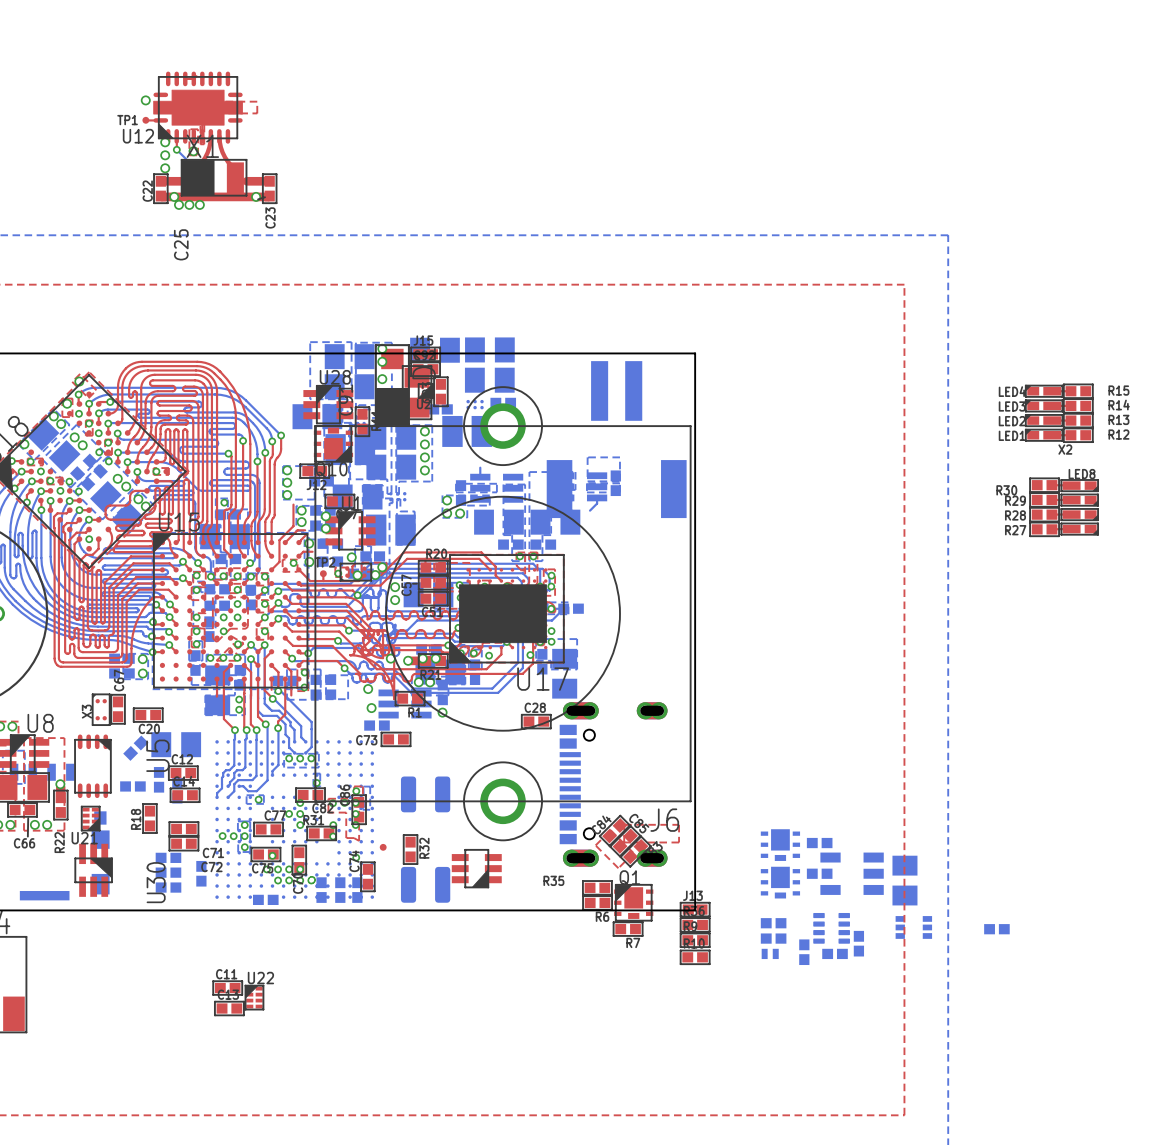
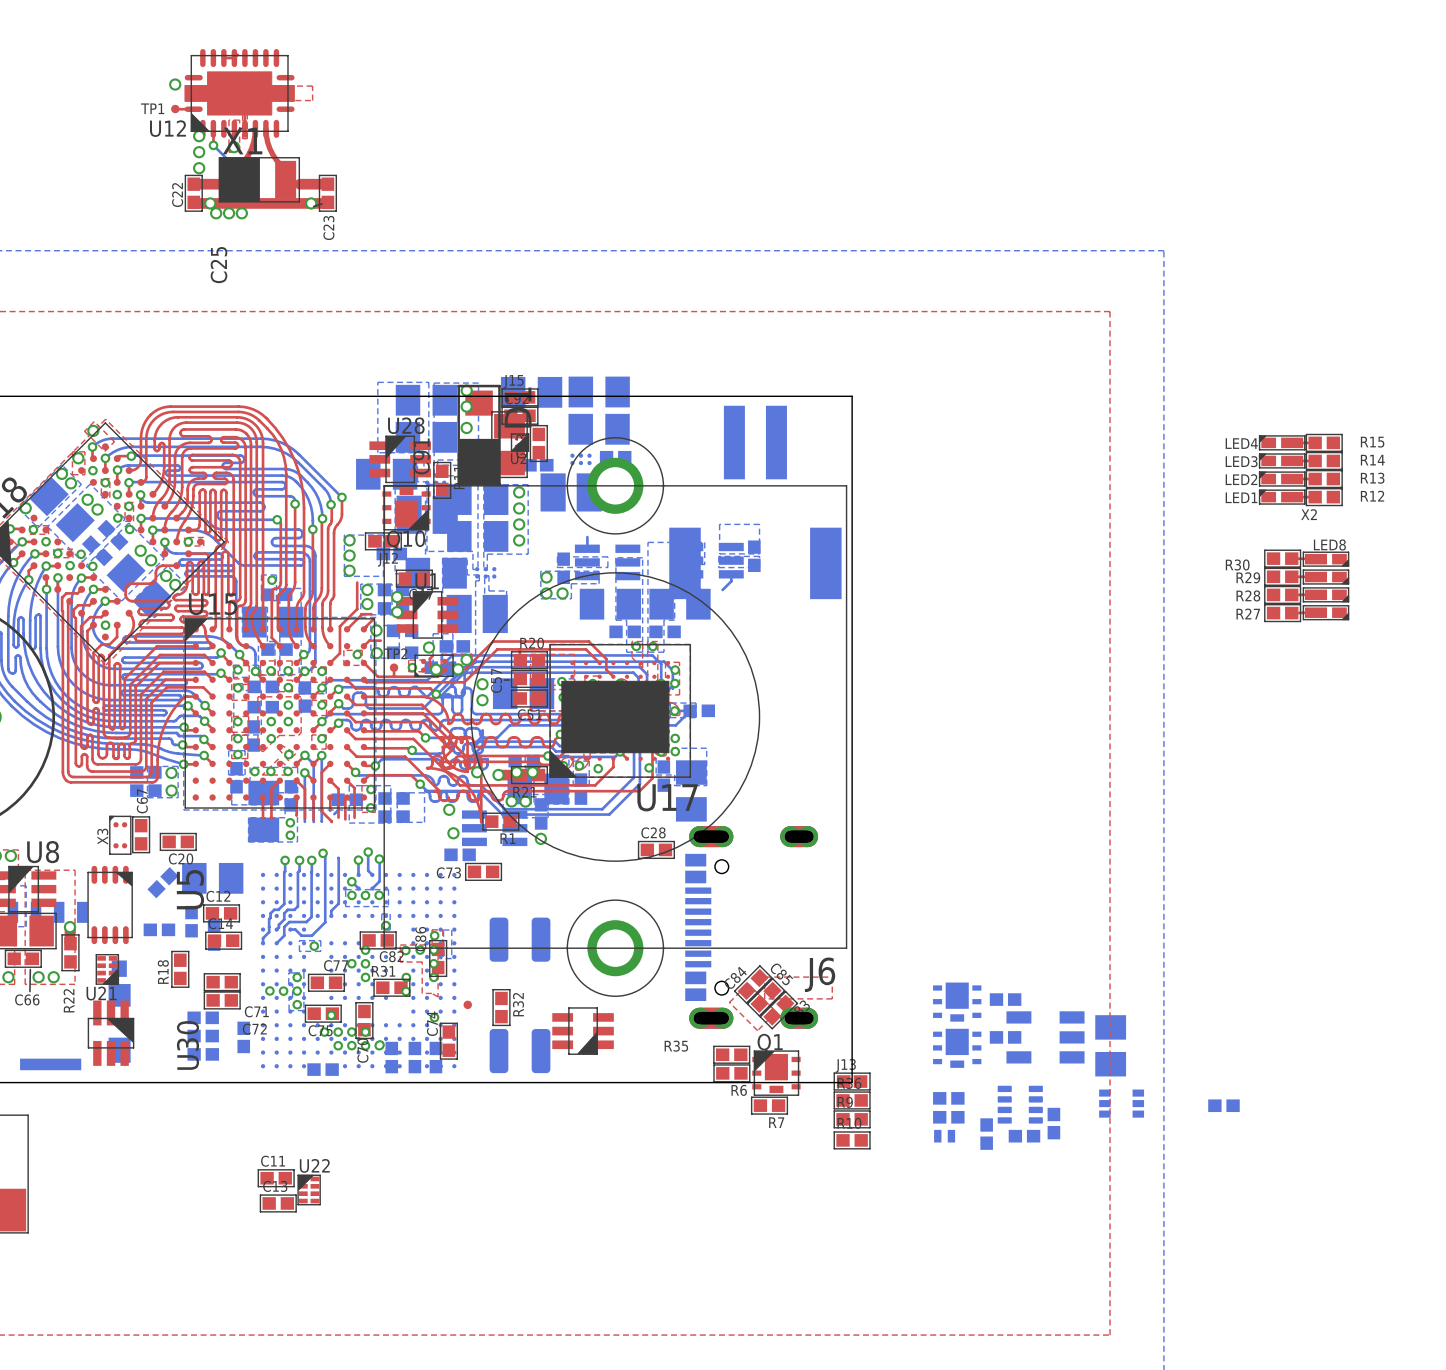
top track: (285, 679) (285, 714) (278, 721) (278, 728) -> (347, 797) (345, 799) (345, 819)
bottom track: (278, 691) (280, 691) (311, 722) (311, 729) -> none
via: (278, 691) -> none
top track: (244, 693) (244, 727) (246, 730) -> none
top track: (250, 694) (250, 724) (256, 730) -> none
top track: (223, 696) (223, 719) (234, 730) -> none
top track: (258, 697) (258, 716) (265, 724) -> none
bottom track: (271, 697) (301, 726) (302, 738) -> (368, 852) (368, 870)
bottom track: (258, 698) (258, 710) (263, 715) (277, 715) (285, 724) -> none
via: (272, 698) -> none
bottom track: (265, 704) (271, 710) (279, 710) (290, 722) (290, 725) (294, 729) -> none
via: none -> (368, 852)
bottom track: (285, 724) (285, 734) (289, 738) (289, 747) -> none
via: (278, 728) -> none
via: none -> (358, 860)
via: none -> (379, 859)
via: none -> (351, 881)

